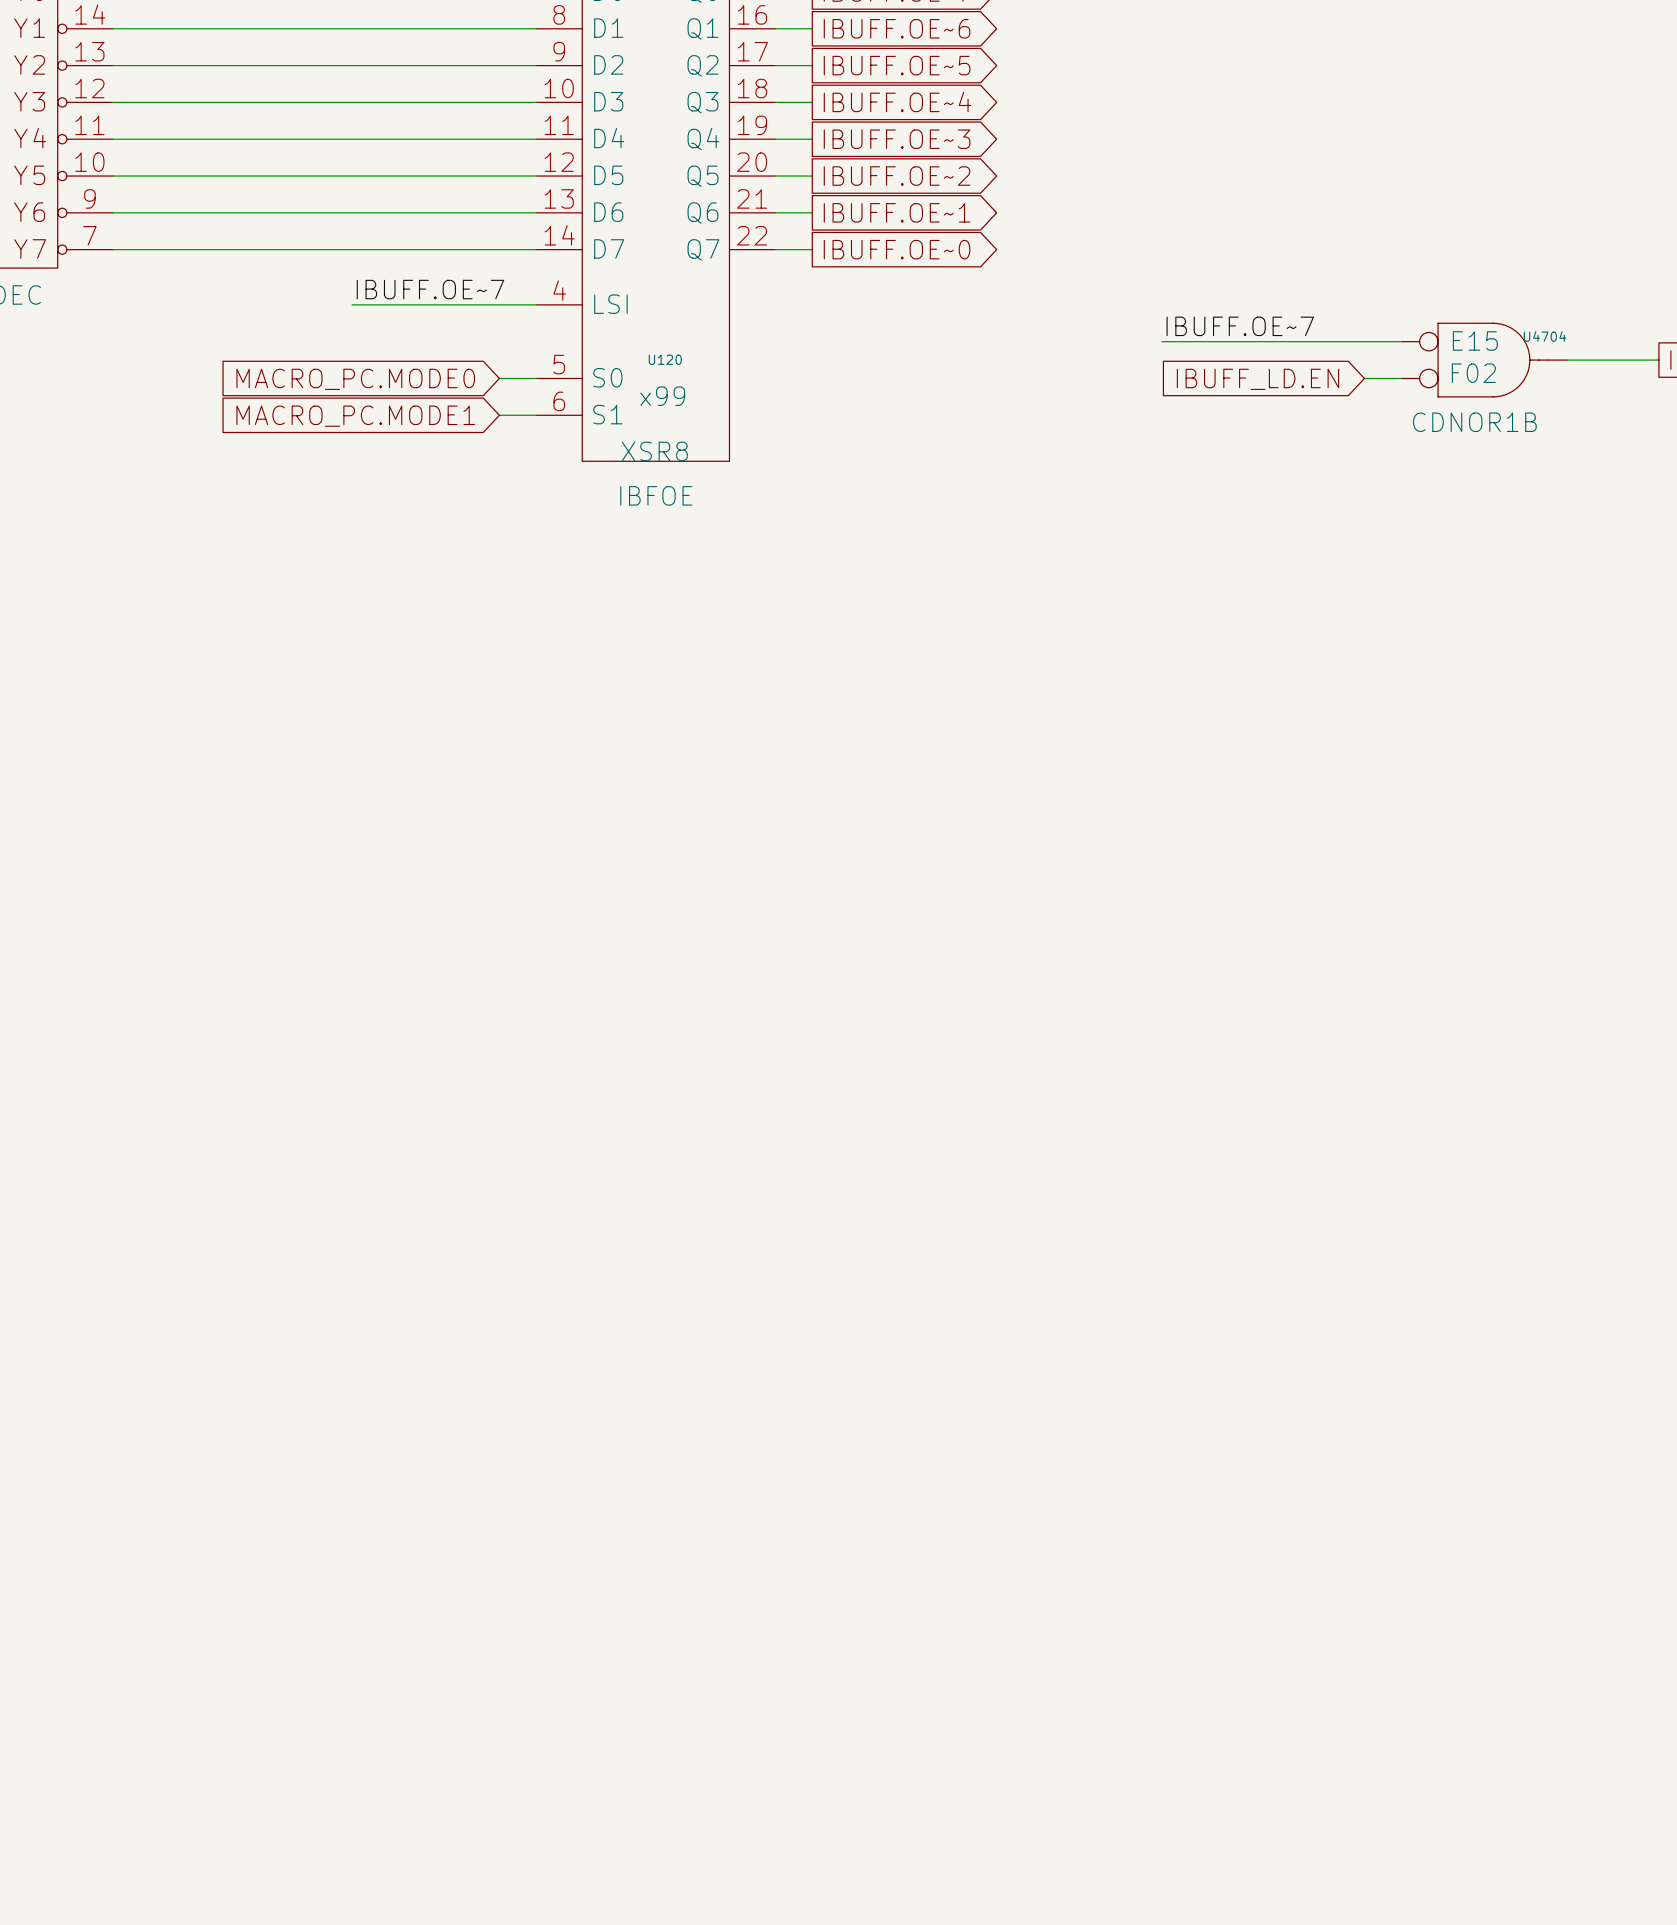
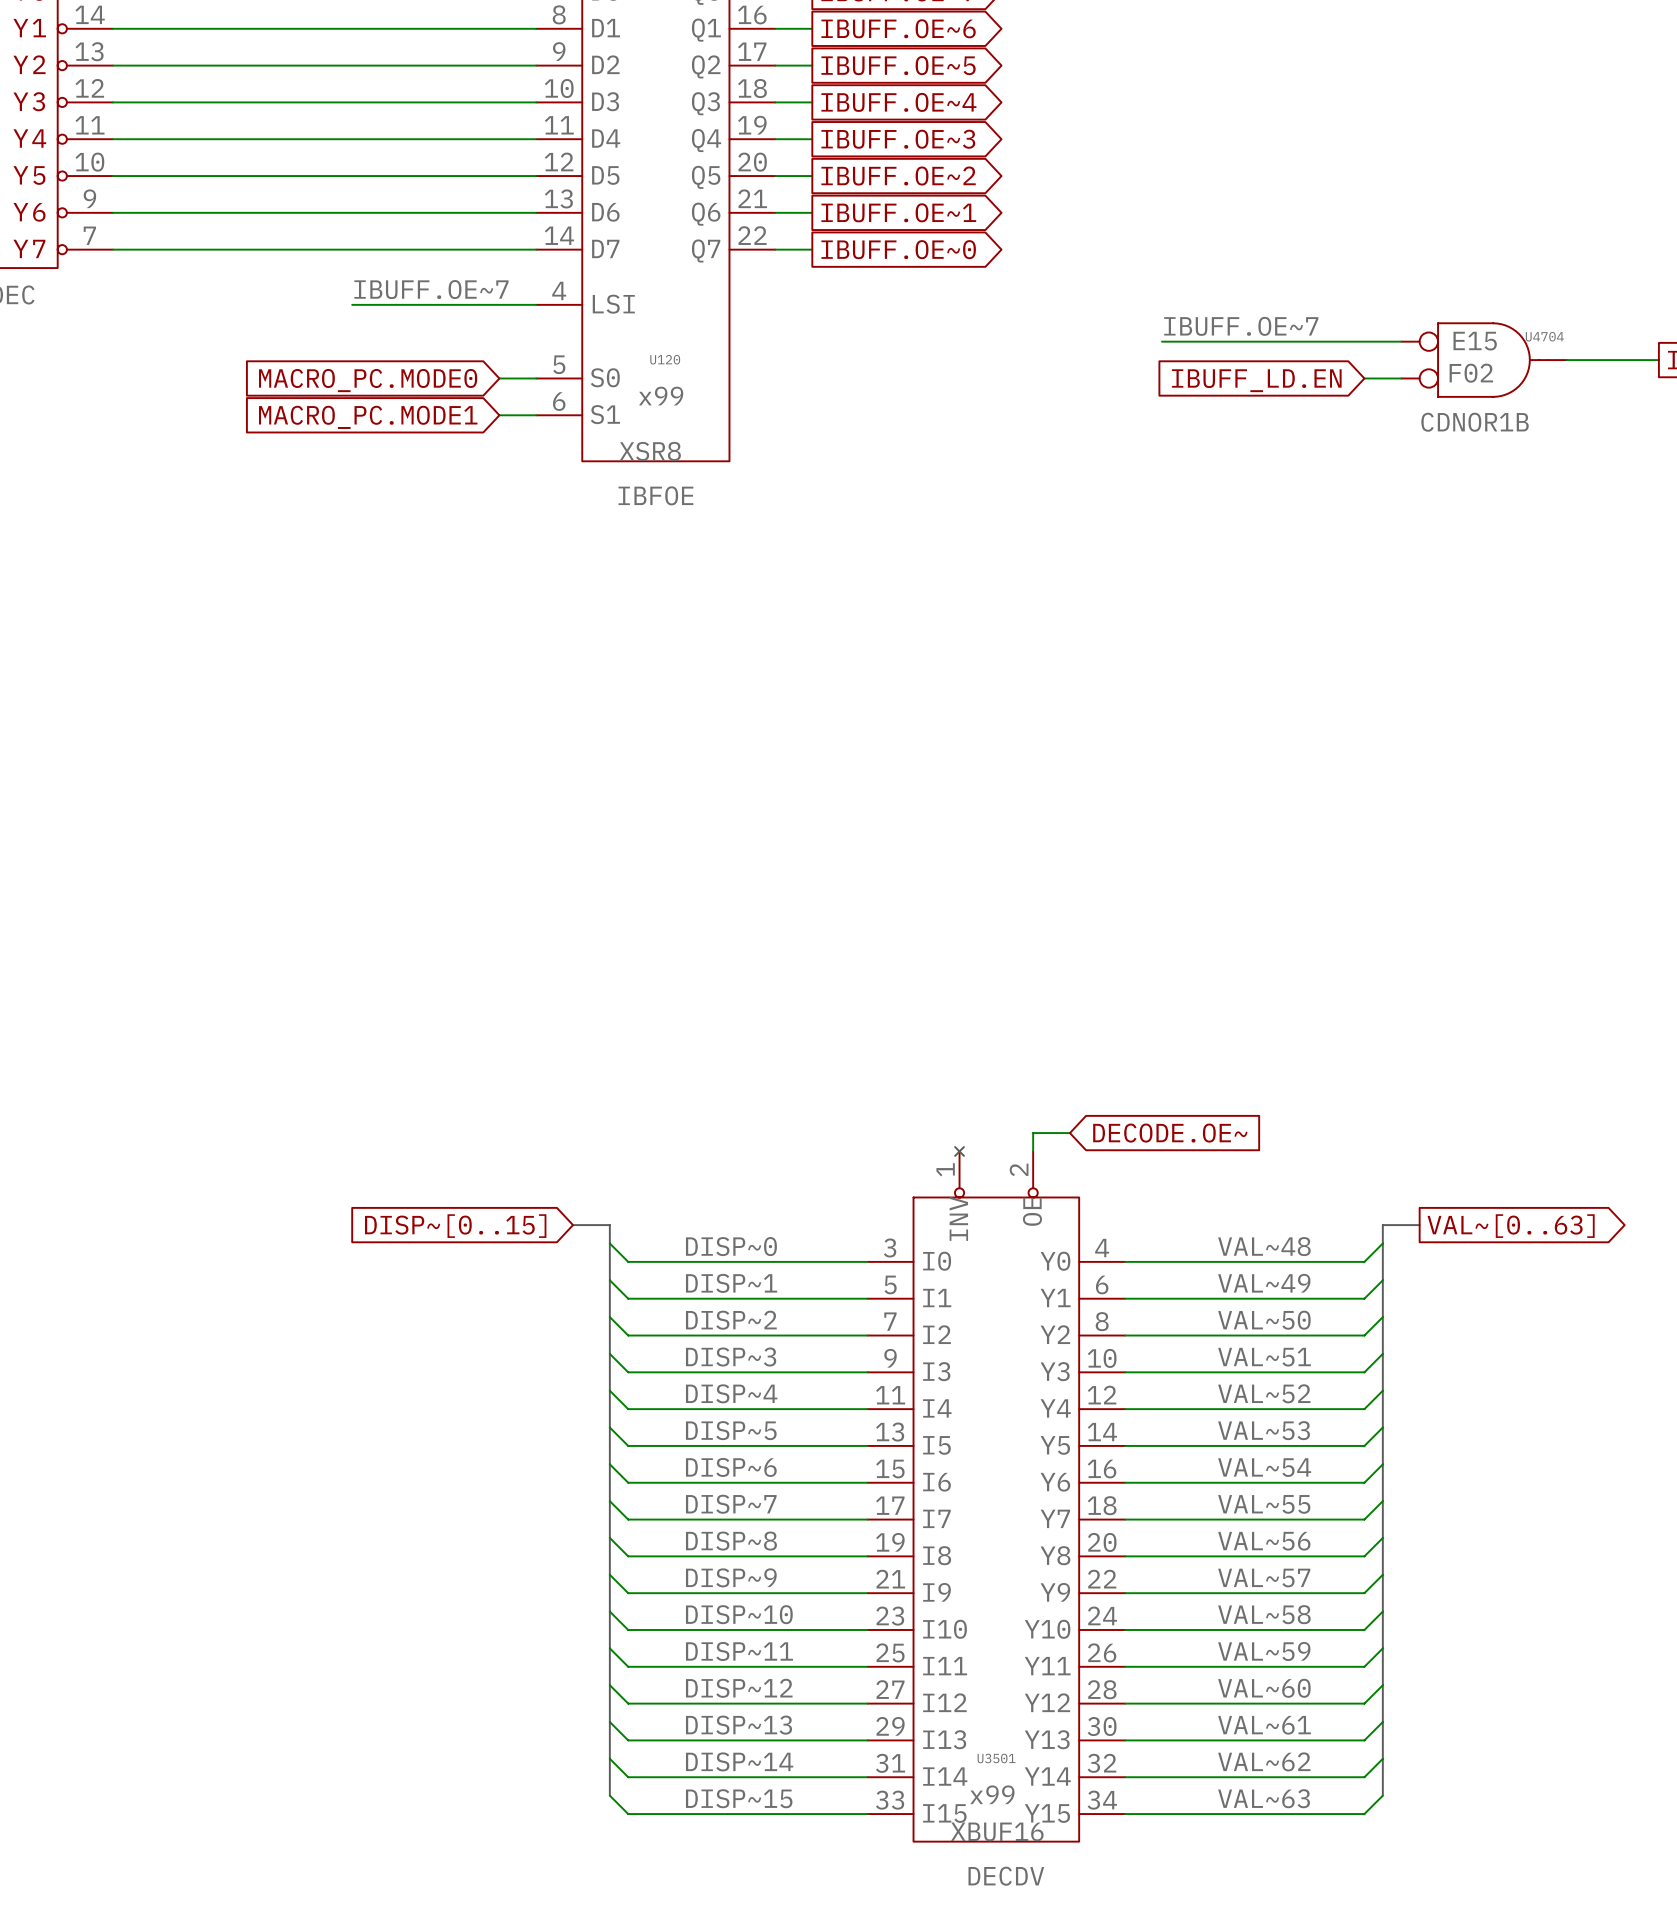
wire: none -> (1069, 1133) (1033, 1133) (1033, 1151)
global label: none -> DECODE.OE~ (1170, 1133)
no-connect mark: none -> (959, 1151)
bus: none -> (573, 1225) (609, 1225) (609, 1795)
bus: none -> (1419, 1225) (1382, 1225) (1382, 1795)
global label: none -> DISP~[0..15] (455, 1226)
global label: none -> VAL~[0..63] (1511, 1226)
wire: none -> (609, 1243) (628, 1261) (867, 1261)
wire: none -> (1382, 1243) (1364, 1261) (1125, 1261)
label: none -> DISP~0 (731, 1246)
label: none -> VAL~48 (1264, 1246)
wire: none -> (609, 1280) (628, 1298) (867, 1298)
wire: none -> (1382, 1280) (1364, 1298) (1125, 1298)
label: none -> VAL~49 (1264, 1283)
label: none -> DISP~1 (731, 1283)
wire: none -> (609, 1317) (628, 1335) (867, 1335)
wire: none -> (1382, 1317) (1364, 1335) (1125, 1335)
label: none -> DISP~2 (731, 1320)
label: none -> VAL~50 (1264, 1320)
wire: none -> (609, 1353) (628, 1372) (867, 1372)
wire: none -> (1382, 1353) (1364, 1372) (1125, 1372)
label: none -> DISP~3 (731, 1357)
label: none -> VAL~51 (1264, 1357)
wire: none -> (609, 1390) (628, 1409) (867, 1409)
wire: none -> (1382, 1390) (1364, 1409) (1125, 1409)
label: none -> DISP~4 (731, 1393)
label: none -> VAL~52 (1264, 1393)
wire: none -> (609, 1427) (628, 1445) (867, 1445)
wire: none -> (1382, 1427) (1364, 1445) (1125, 1445)
label: none -> DISP~5 (731, 1430)
label: none -> VAL~53 (1264, 1430)
wire: none -> (609, 1464) (628, 1482) (867, 1482)
wire: none -> (1382, 1464) (1364, 1482) (1125, 1482)
label: none -> DISP~6 (731, 1467)
label: none -> VAL~54 (1264, 1467)
U3501: none -> XBUF16 (996, 1496)
wire: none -> (609, 1501) (628, 1519) (867, 1519)
wire: none -> (1382, 1501) (1364, 1519) (1125, 1519)
label: none -> DISP~7 (731, 1504)
label: none -> VAL~55 (1264, 1504)
wire: none -> (609, 1537) (628, 1556) (867, 1556)
wire: none -> (1382, 1537) (1364, 1556) (1125, 1556)
label: none -> DISP~8 (731, 1541)
label: none -> VAL~56 (1264, 1541)
wire: none -> (609, 1574) (628, 1593) (867, 1593)
wire: none -> (1382, 1574) (1364, 1593) (1125, 1593)
label: none -> DISP~9 (731, 1577)
label: none -> VAL~57 (1264, 1578)
wire: none -> (609, 1611) (628, 1629) (867, 1629)
wire: none -> (1382, 1611) (1364, 1629) (1125, 1629)
label: none -> DISP~10 (739, 1614)
label: none -> VAL~58 (1264, 1614)
wire: none -> (609, 1648) (628, 1666) (867, 1666)
wire: none -> (1382, 1648) (1364, 1666) (1125, 1666)
label: none -> DISP~11 (739, 1651)
label: none -> VAL~59 (1264, 1651)
wire: none -> (609, 1685) (628, 1703) (867, 1703)
wire: none -> (1382, 1685) (1364, 1703) (1125, 1703)
label: none -> DISP~12 (739, 1688)
label: none -> VAL~60 (1264, 1688)
wire: none -> (609, 1722) (628, 1740) (867, 1740)
wire: none -> (1382, 1722) (1364, 1740) (1125, 1740)
label: none -> DISP~13 (739, 1725)
label: none -> VAL~61 (1264, 1725)
wire: none -> (609, 1758) (628, 1777) (867, 1777)
wire: none -> (1382, 1758) (1364, 1777) (1125, 1777)
label: none -> DISP~14 (739, 1761)
label: none -> VAL~62 (1264, 1761)
wire: none -> (609, 1795) (628, 1814) (867, 1814)
wire: none -> (1382, 1795) (1364, 1814) (1125, 1814)
label: none -> DISP~15 (739, 1798)
label: none -> VAL~63 (1264, 1798)

